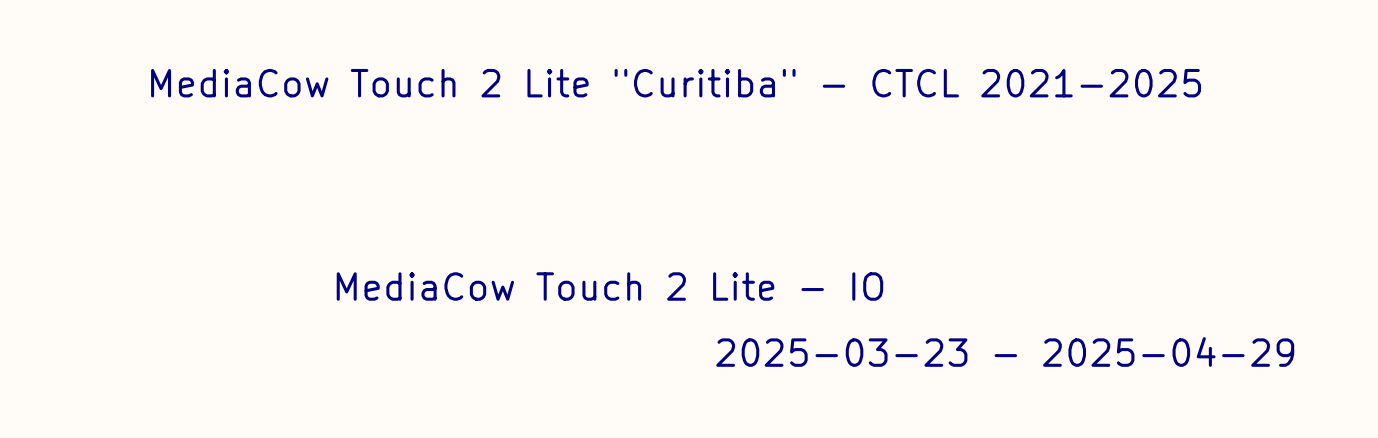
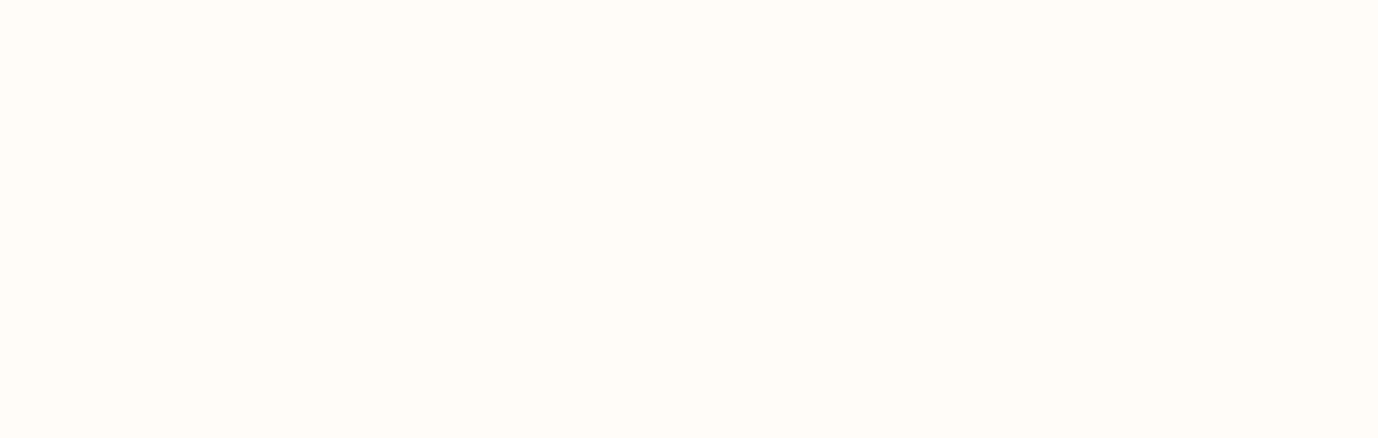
text: MediaCow Touch 2 Lite "Curitiba" - CTCL 2021-2025 (676, 83) -> none
text: MediaCow Touch 2 Lite - IO (609, 286) -> none
text: 2025-03-23 - 2025-04-29 (1005, 351) -> none

